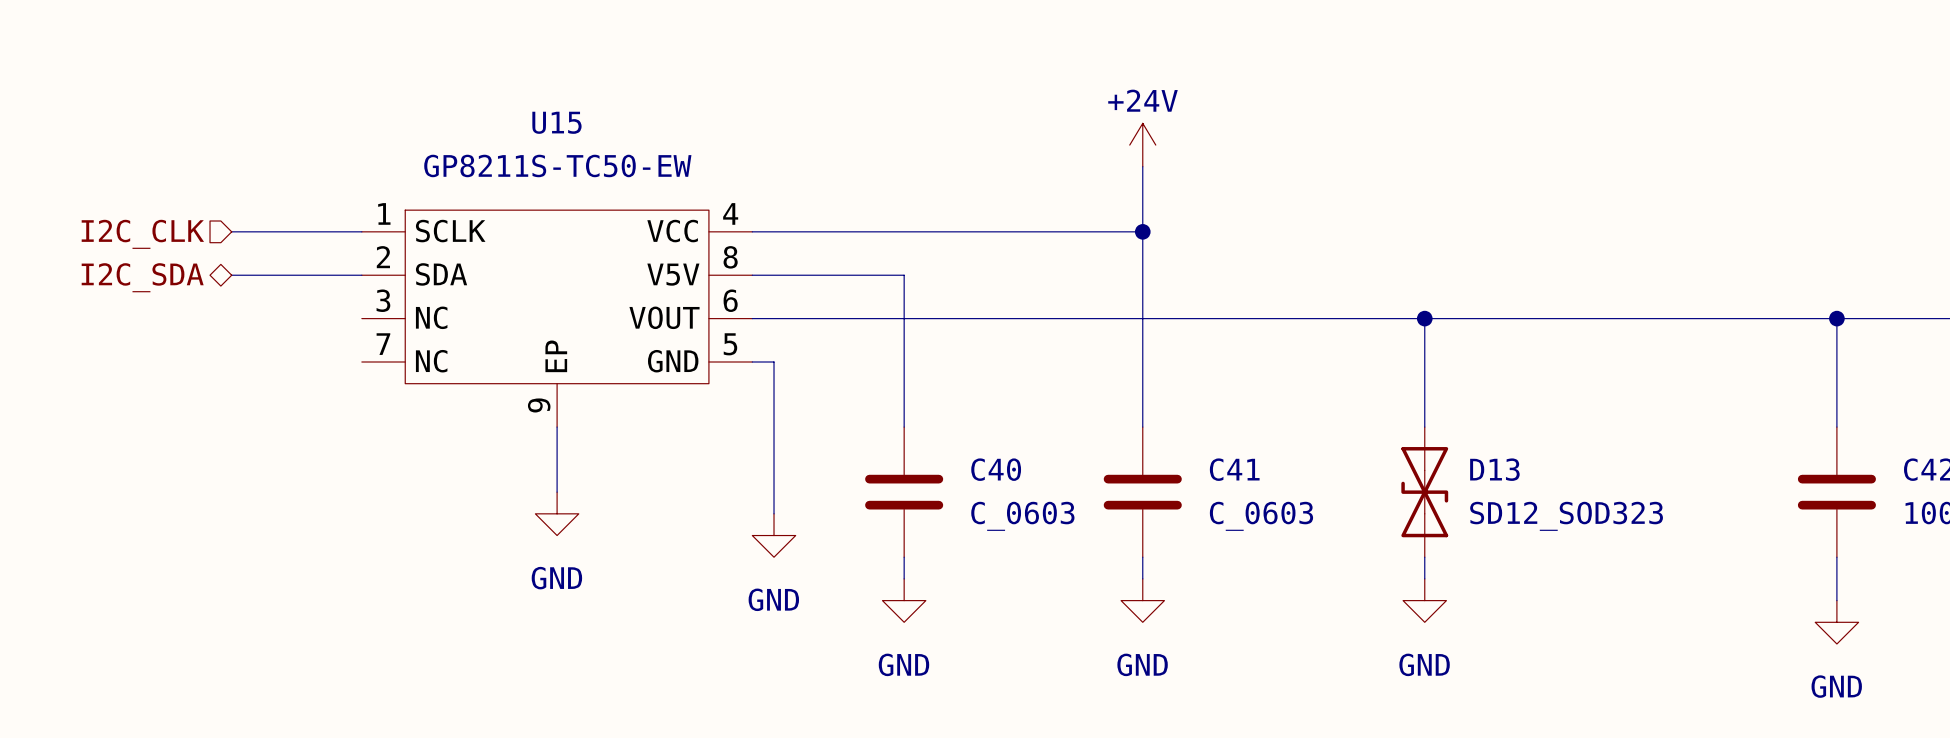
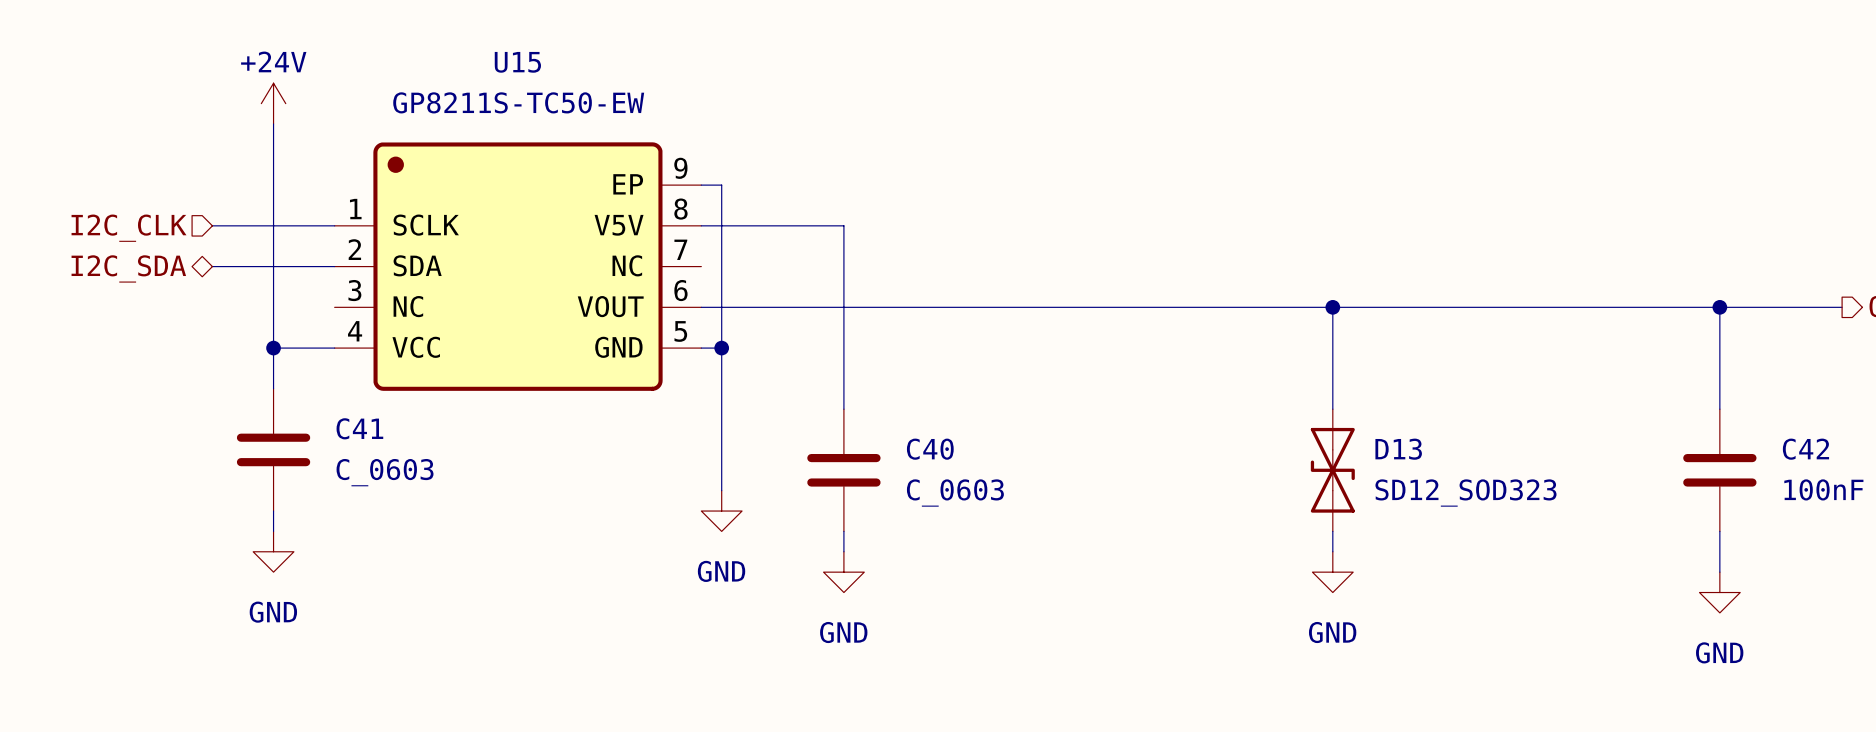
power symbol: none -> +24V (273, 103)
wire: none -> (273, 123) (273, 388)
power symbol: +24V (1142, 145) -> none
wire: (1142, 166) (1142, 427) -> none
wire: none -> (701, 185) (721, 185) (721, 348)
U15 symbol: [361, 210, 753, 428] -> [334, 142, 702, 391]
wire: (904, 231) (1142, 231) -> none
junction: (1142, 231) -> none
wire: (752, 275) (904, 275) -> (843, 225) (843, 266)
wire: none -> (273, 348) (334, 348)
junction: none -> (273, 348)
junction: none -> (721, 348)
wire: (557, 427) (557, 492) -> none
C41 position: (1142, 492) -> (273, 449)
power symbol position: GND (557, 513) -> GND (273, 551)
wire: none -> (273, 511) (273, 531)
wire: (1142, 557) (1142, 578) -> none
power symbol: GND (1142, 600) -> none

